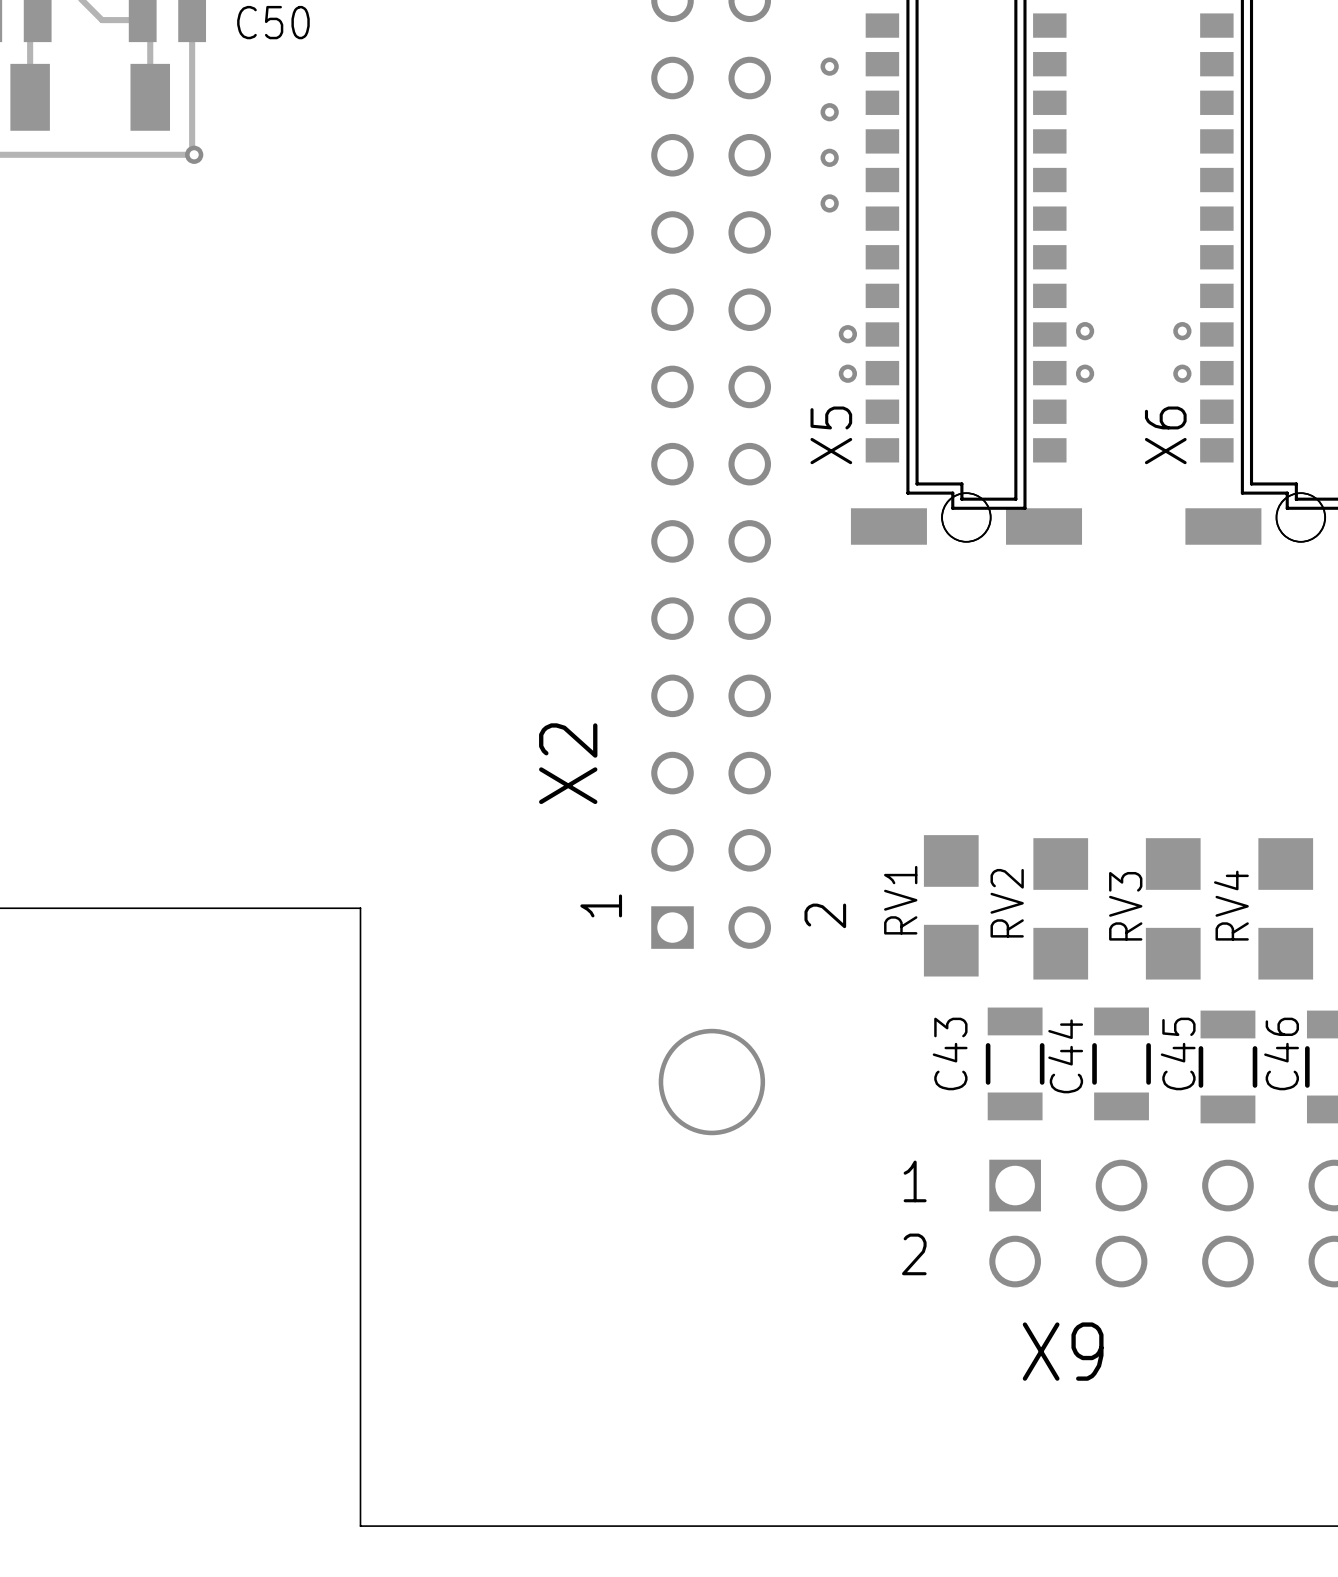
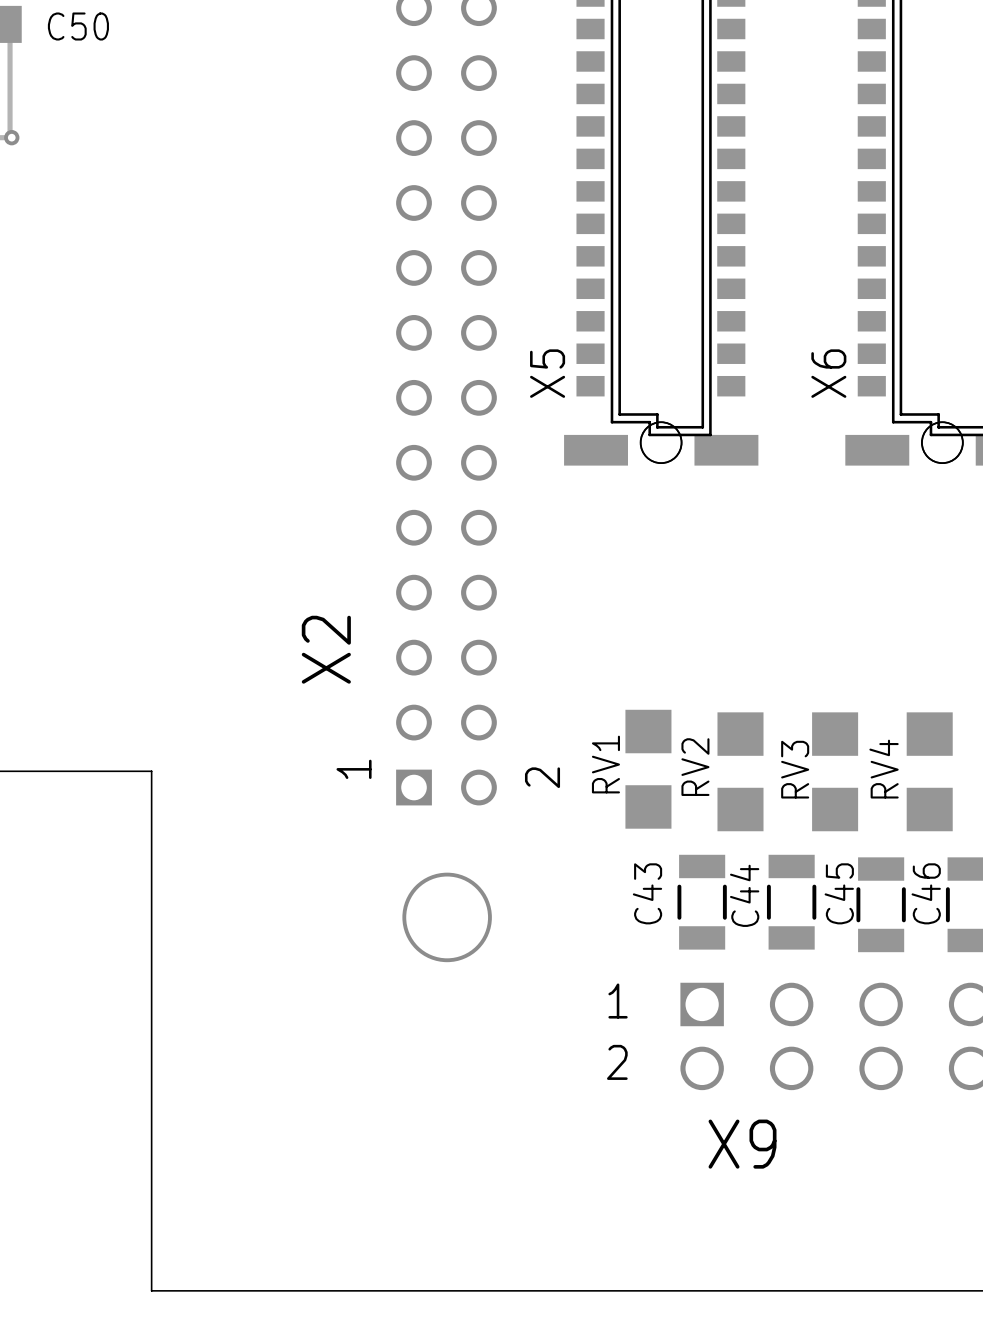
via: (829, 66) -> none
via: (829, 112) -> none
via: (829, 157) -> none
via: (829, 203) -> none
via: (1085, 331) -> none
via: (1182, 331) -> none
via: (847, 334) -> none
via: (847, 373) -> none
via: (1085, 373) -> none
via: (1182, 373) -> none

